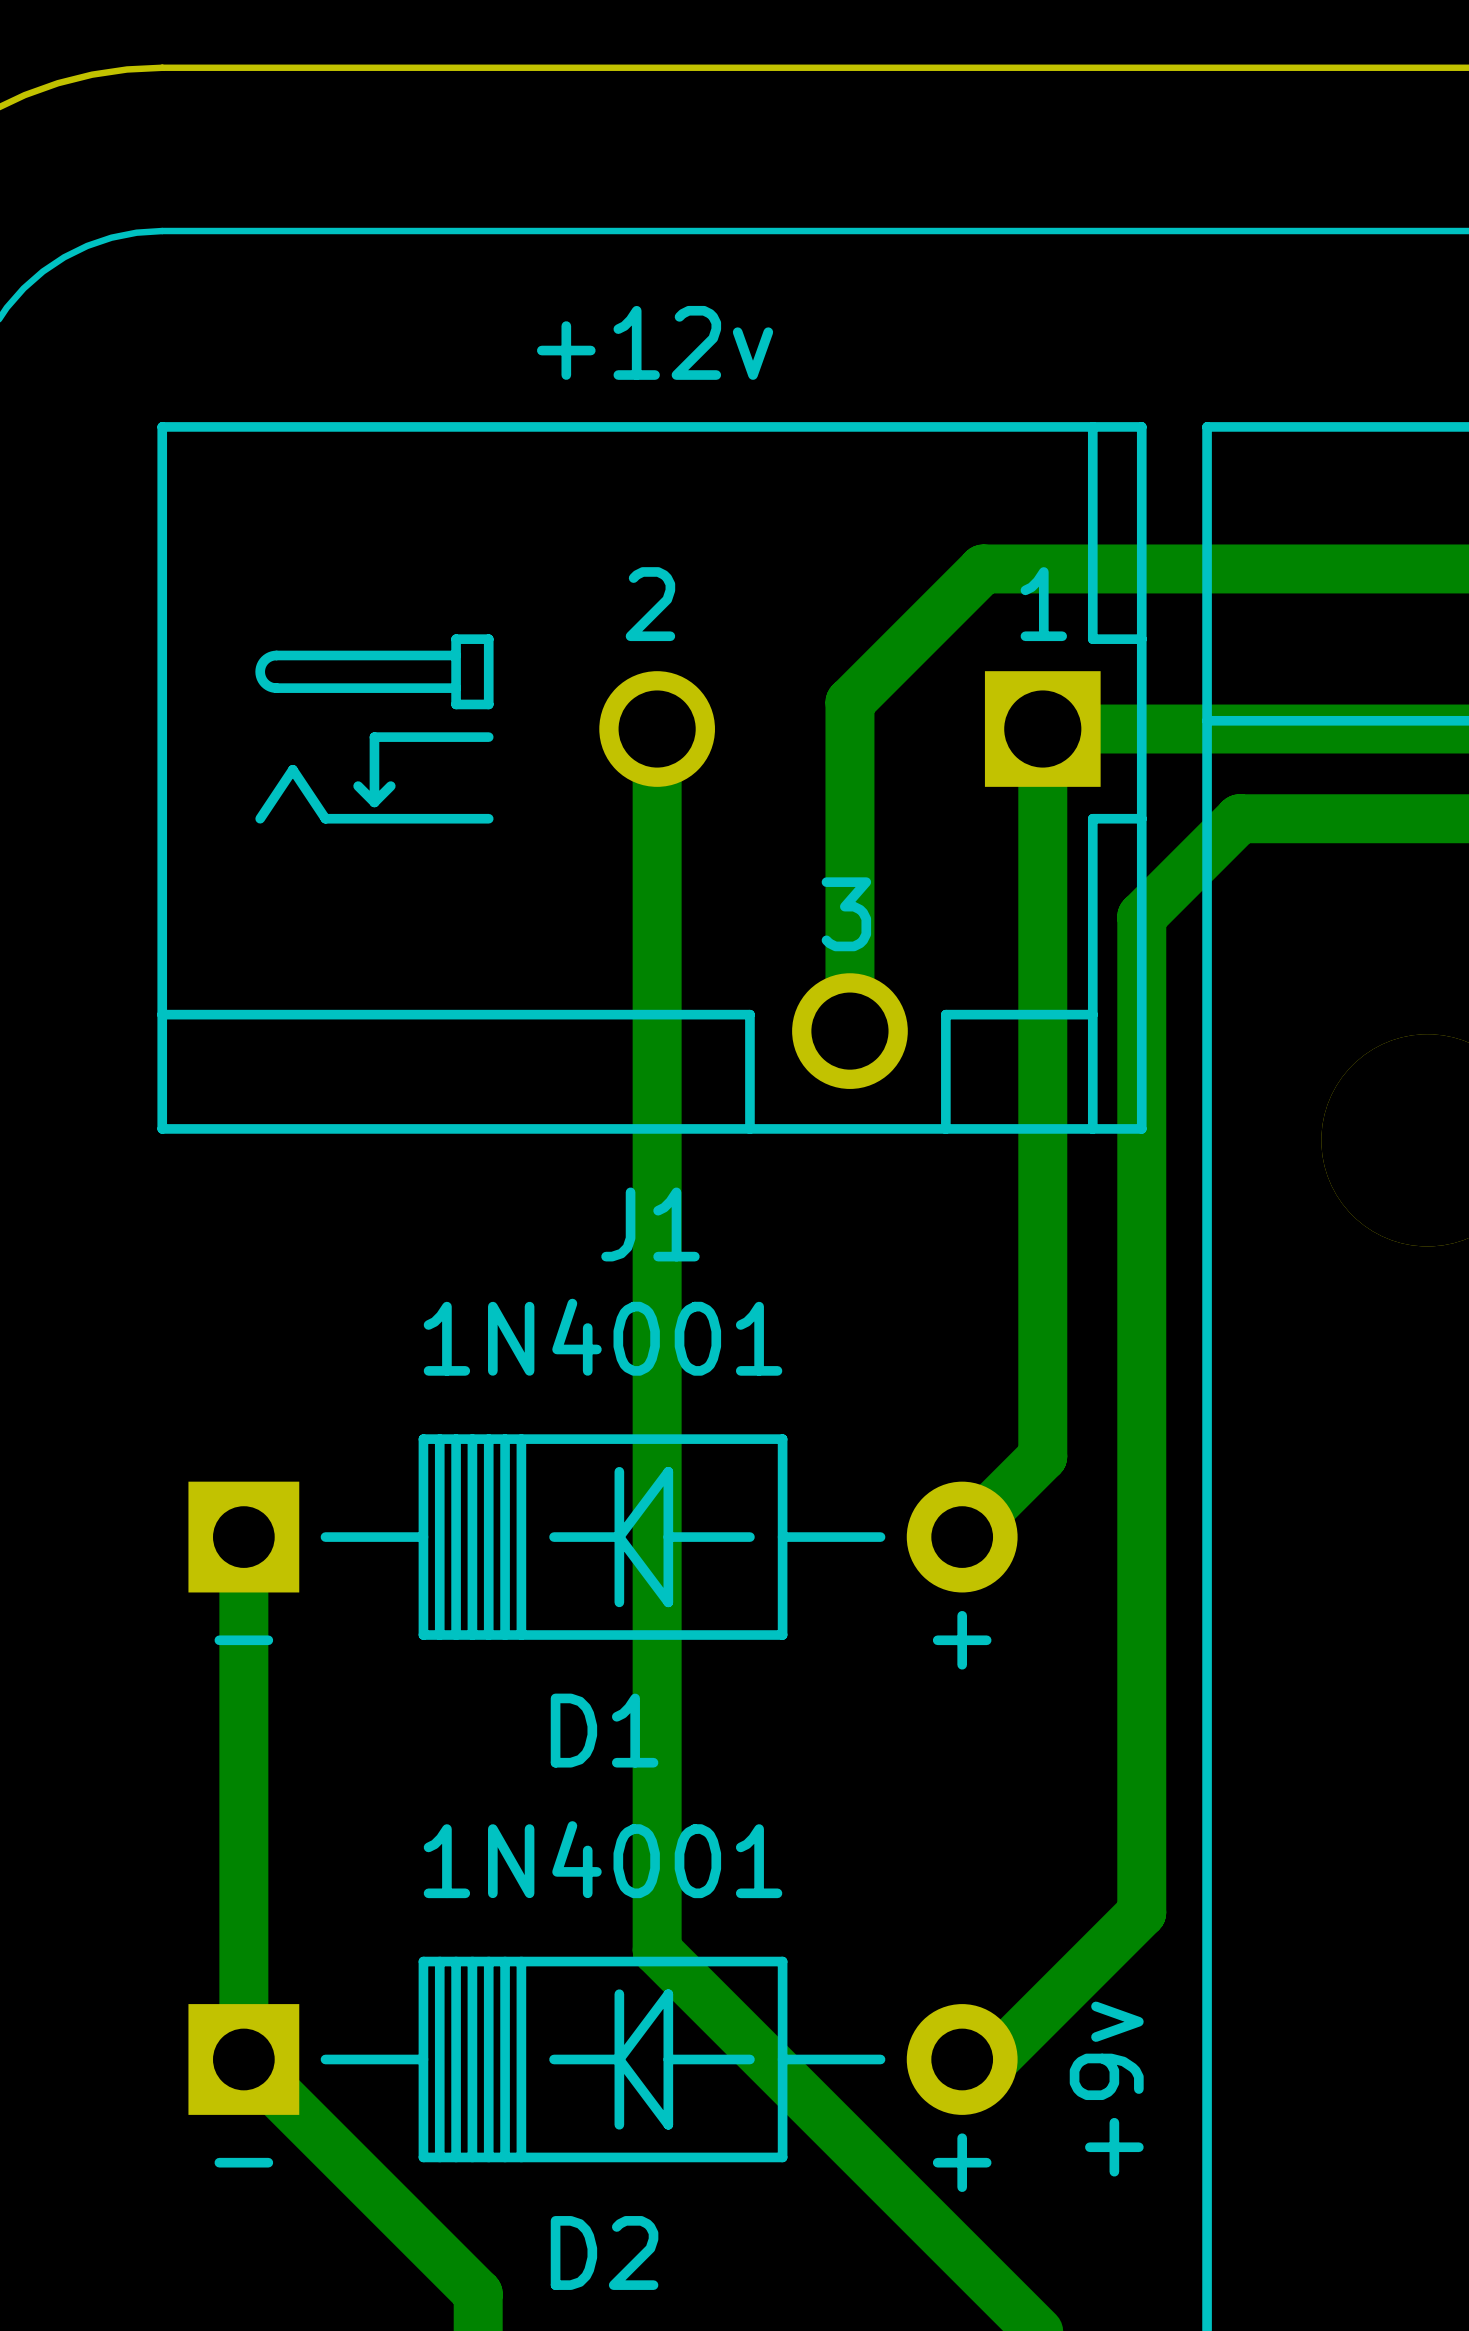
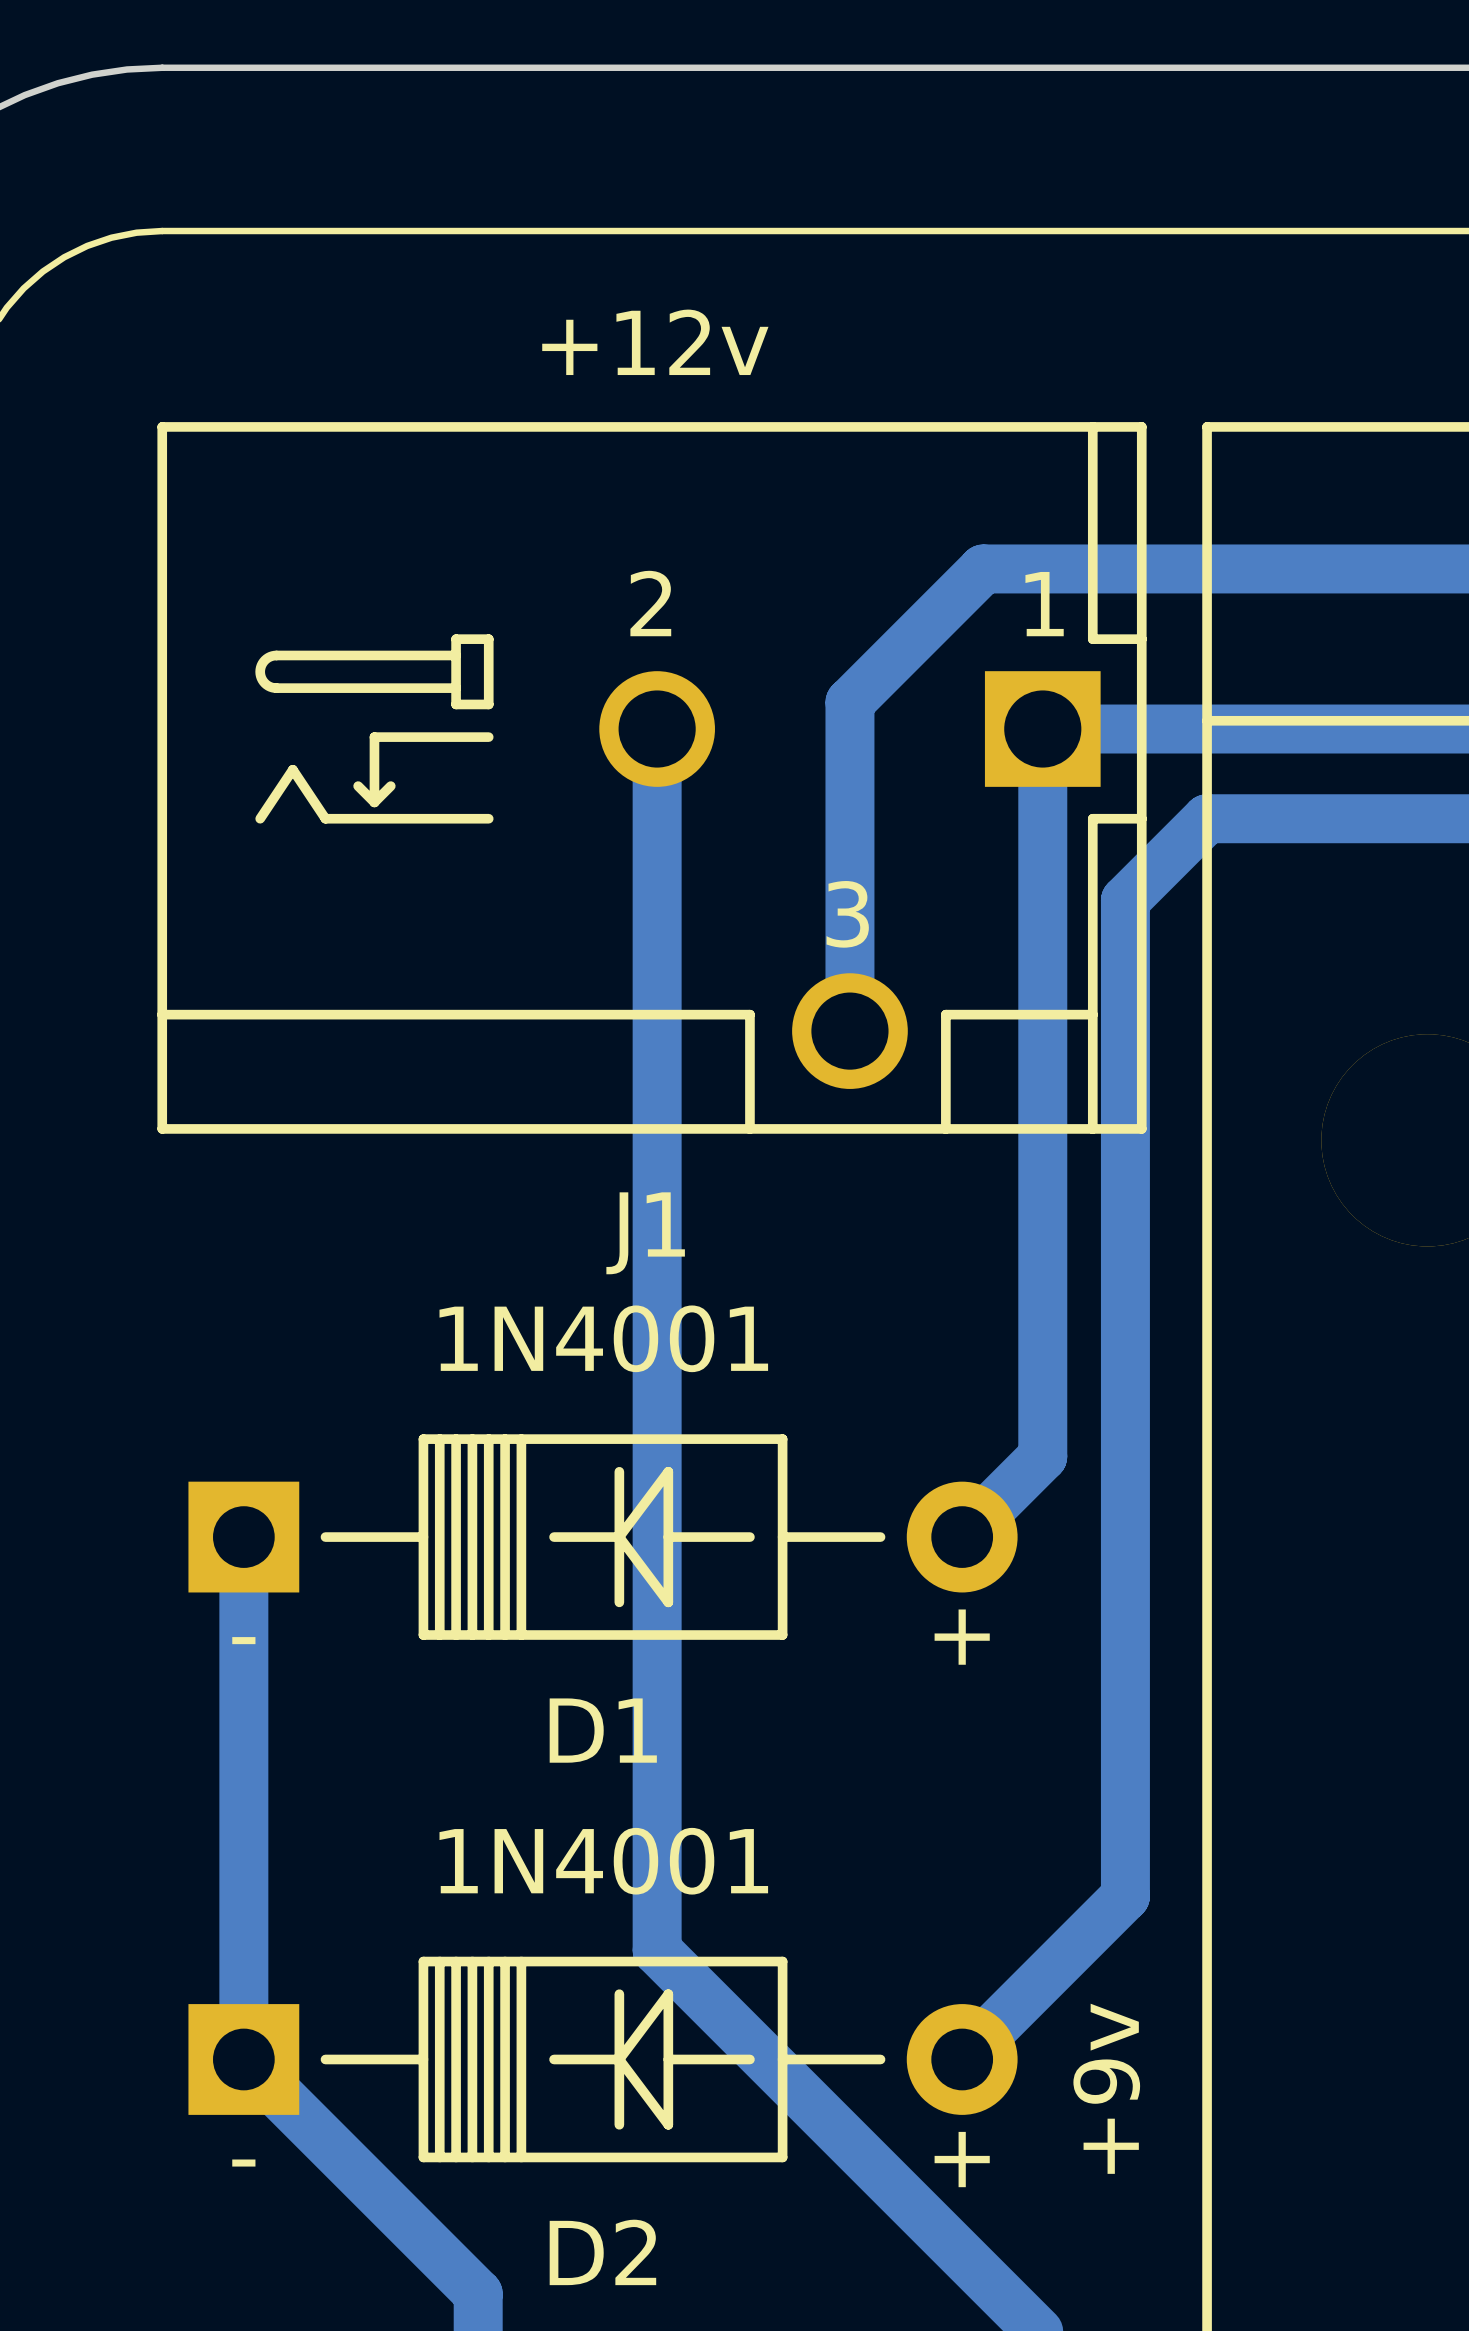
bottom track: (1239, 818) (1141, 916) (1141, 1912) (994, 2059) -> (1239, 818) (1207, 818) (1125, 900) (1125, 1896) (962, 2059)

